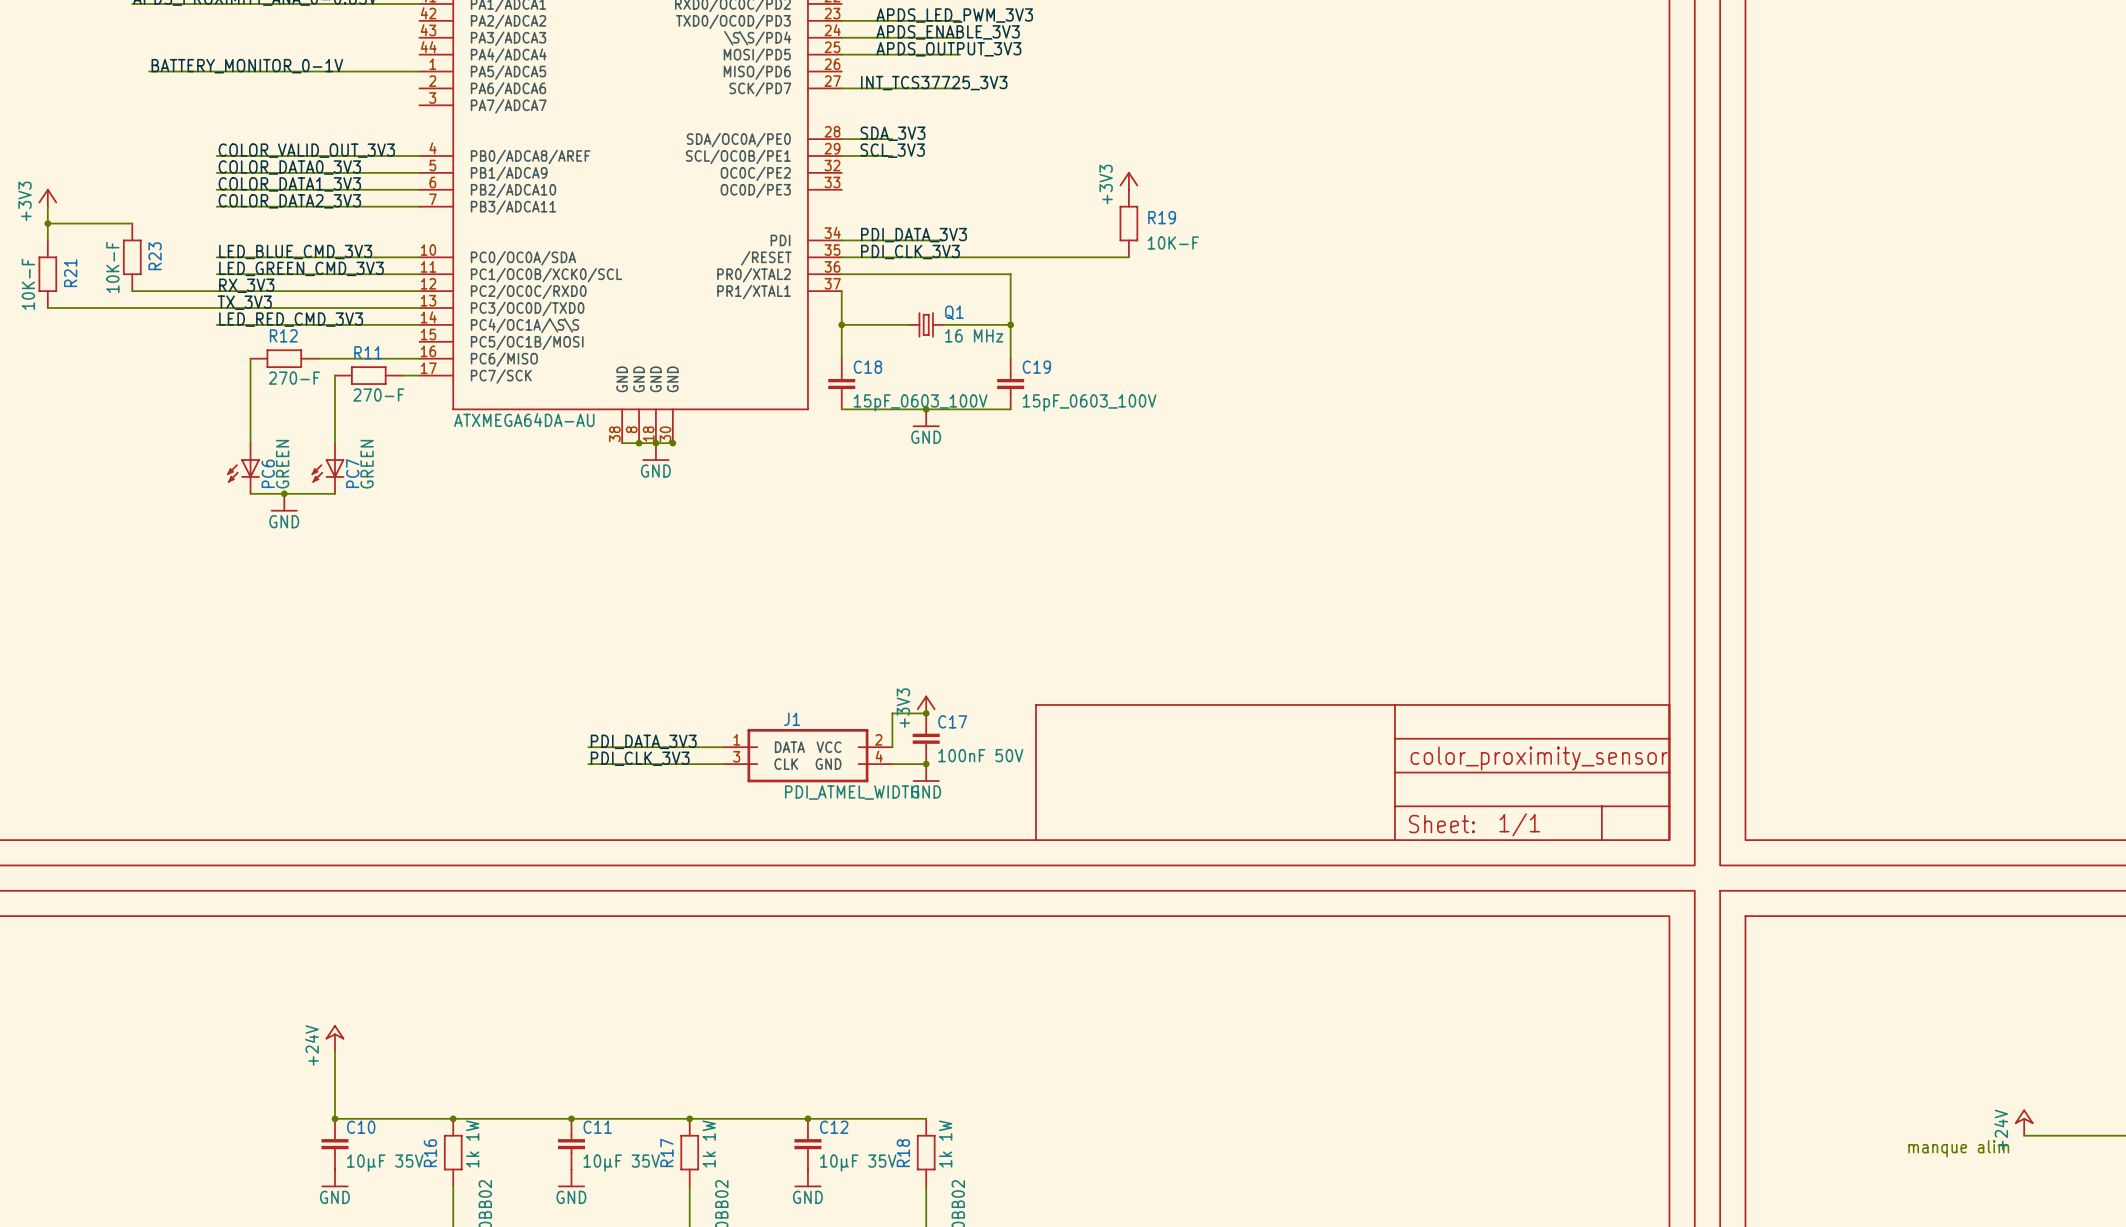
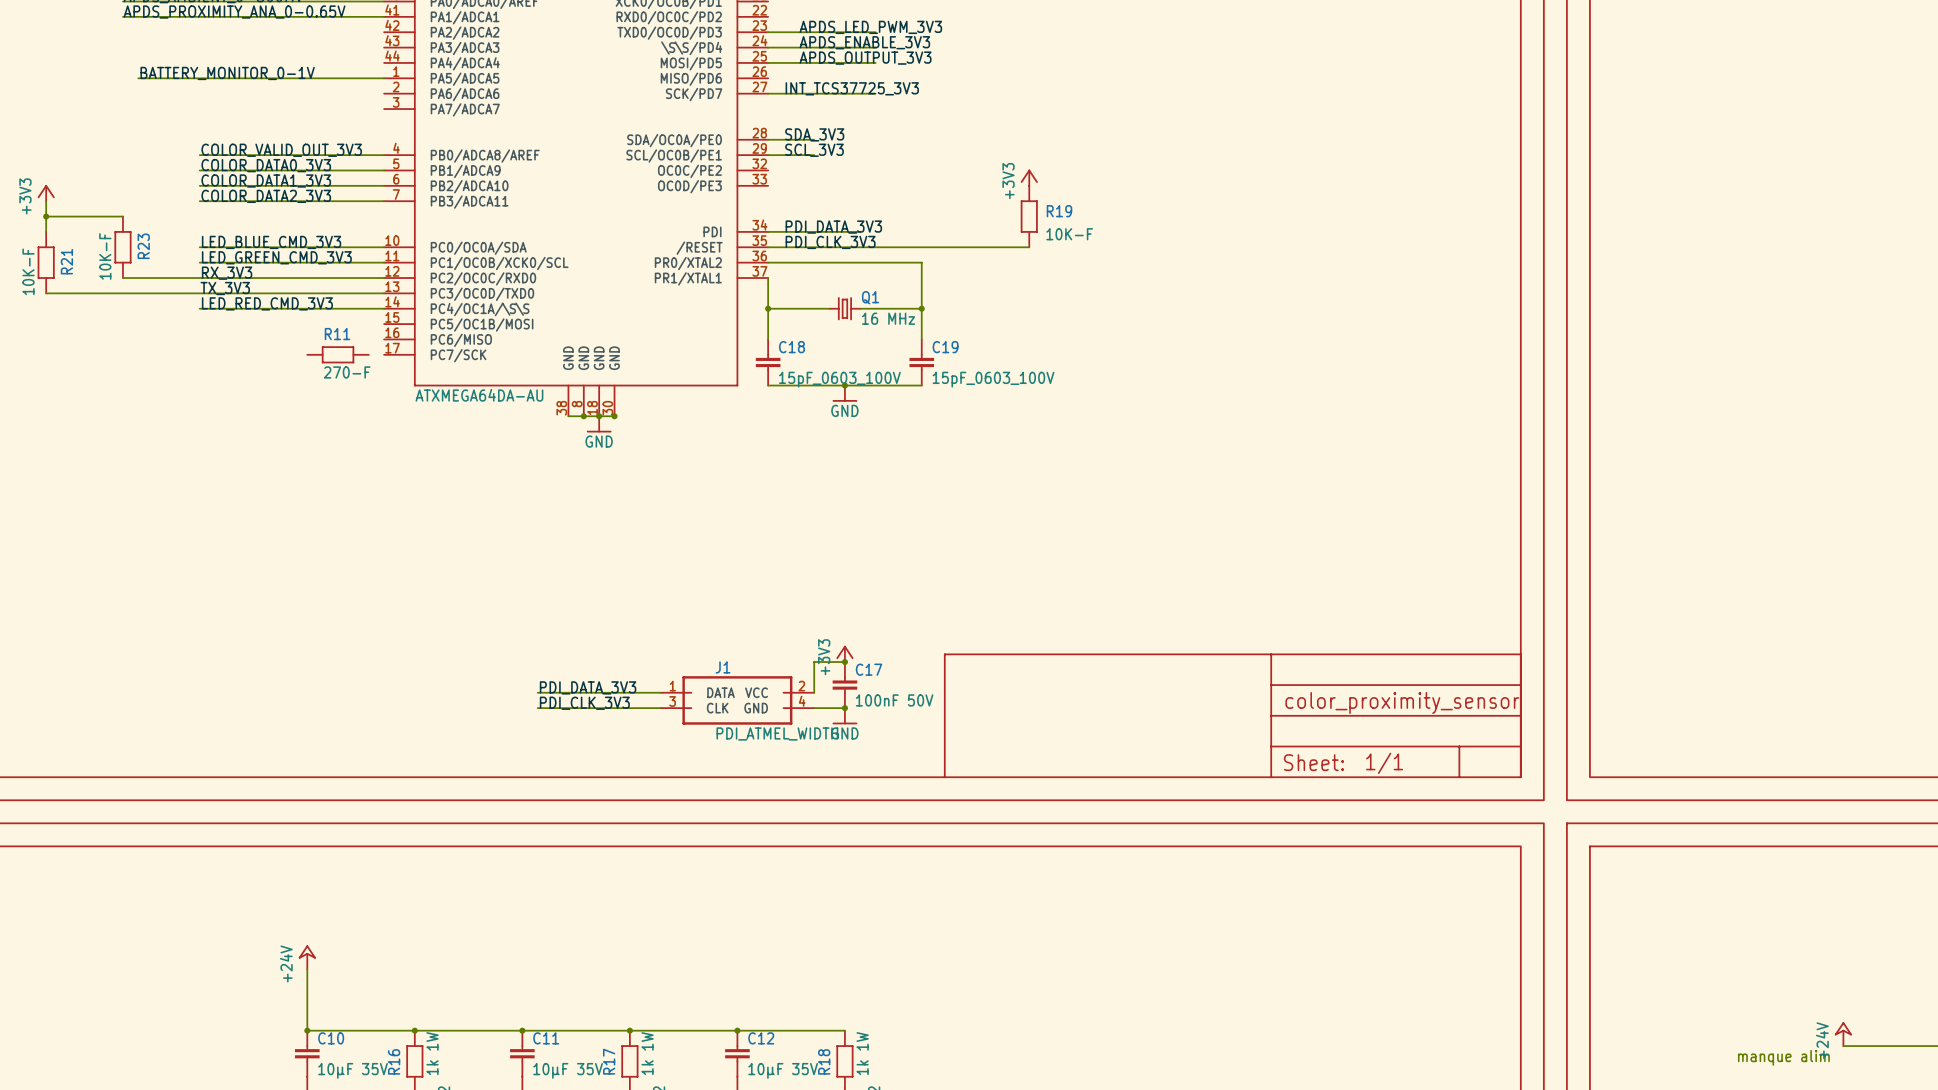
wire: (250, 358) (250, 443) -> none
R12: 270-F (284, 358) -> none
wire: (318, 358) (419, 358) -> none
wire: (334, 375) (334, 443) -> none
wire: (402, 375) (419, 375) -> none
PC6: GREEN (243, 468) -> none
PC7: GREEN (327, 468) -> none
wire: (250, 493) (334, 493) -> none
junction: (284, 493) -> none
power symbol: GND (284, 502) -> none

